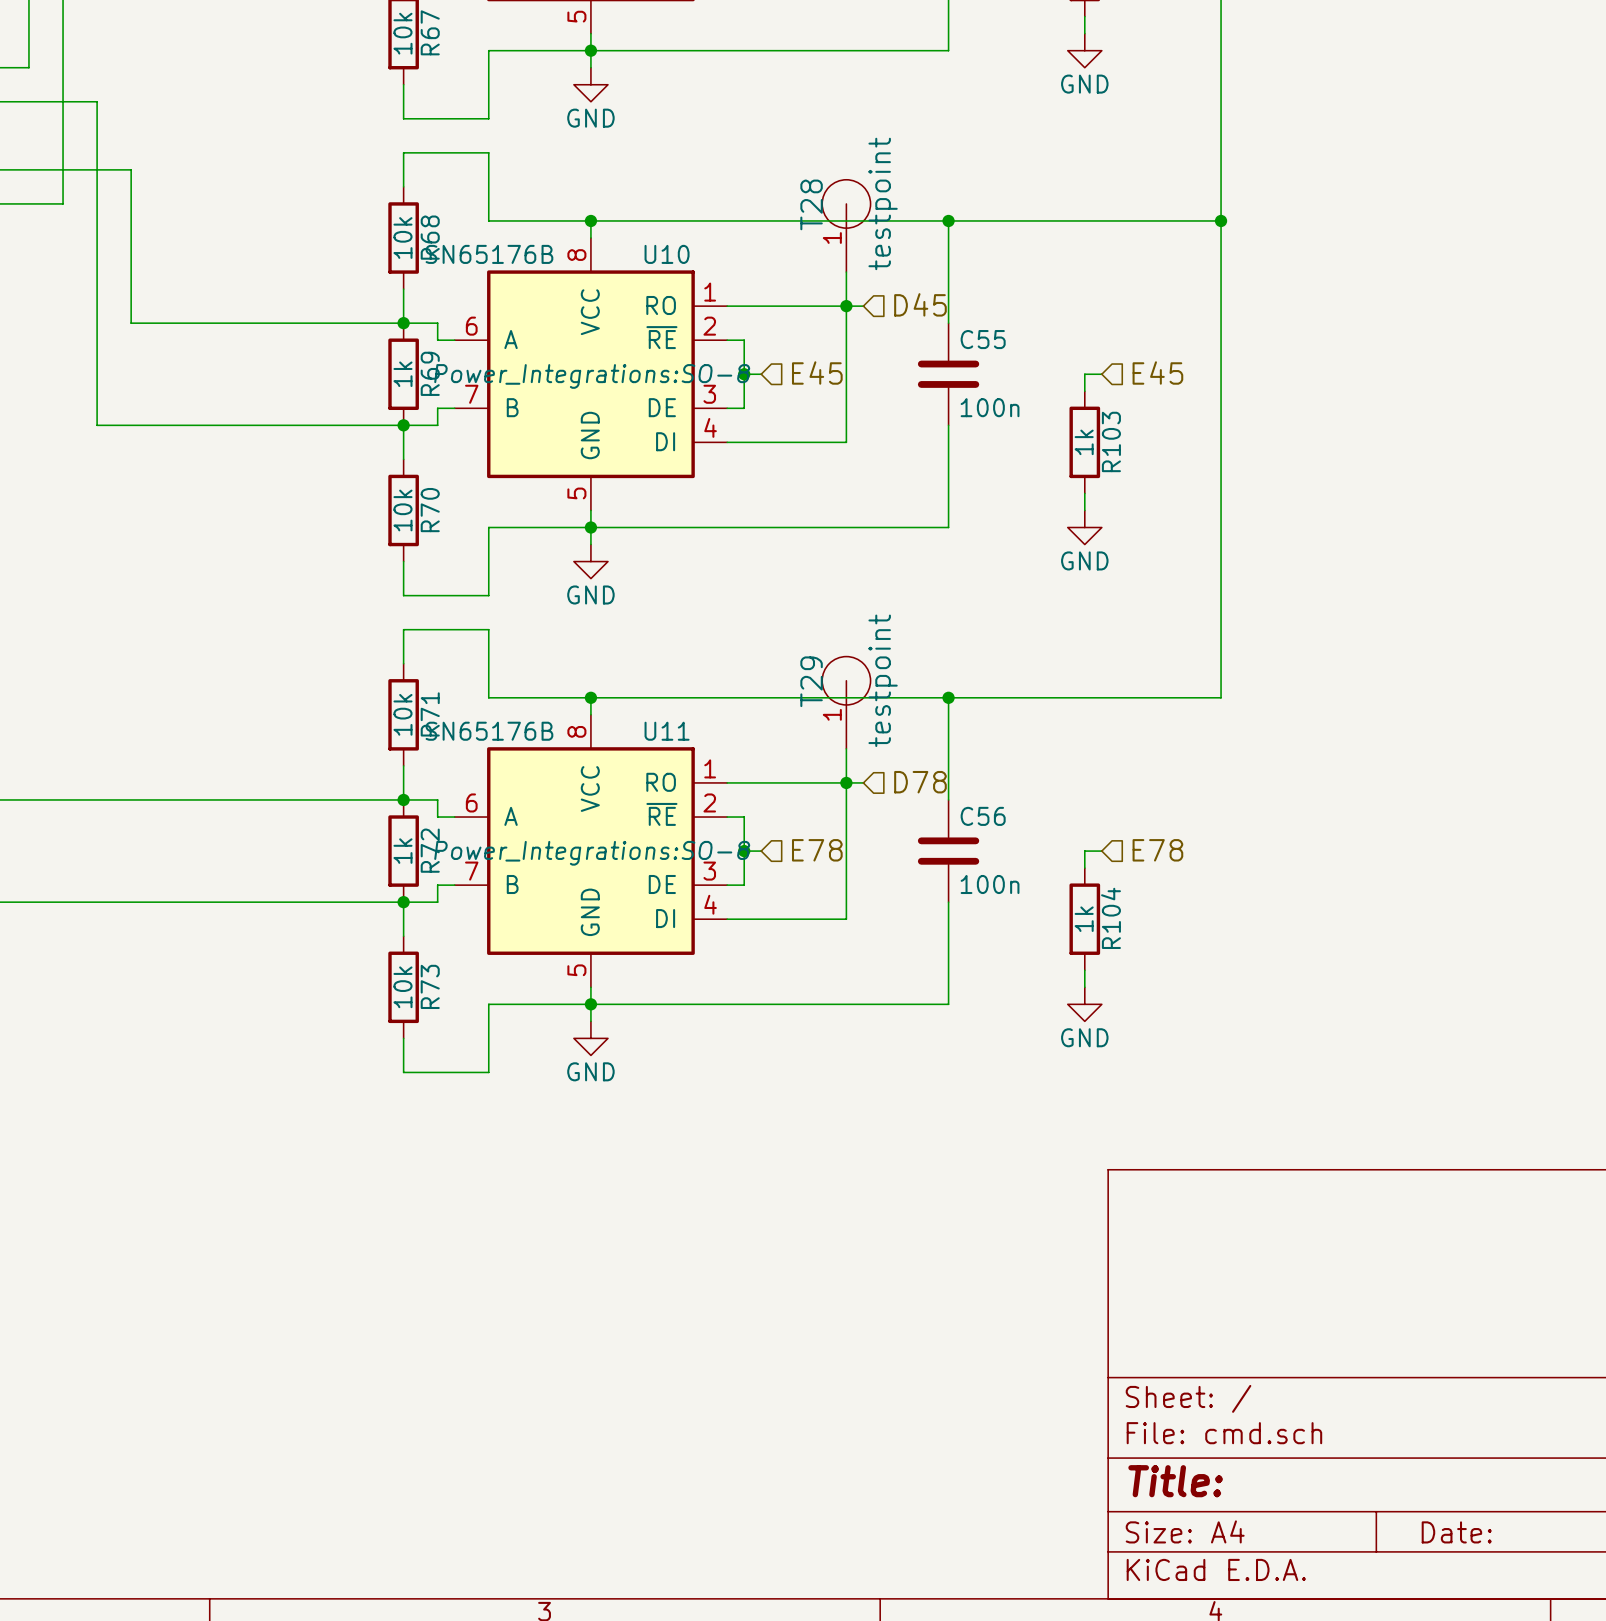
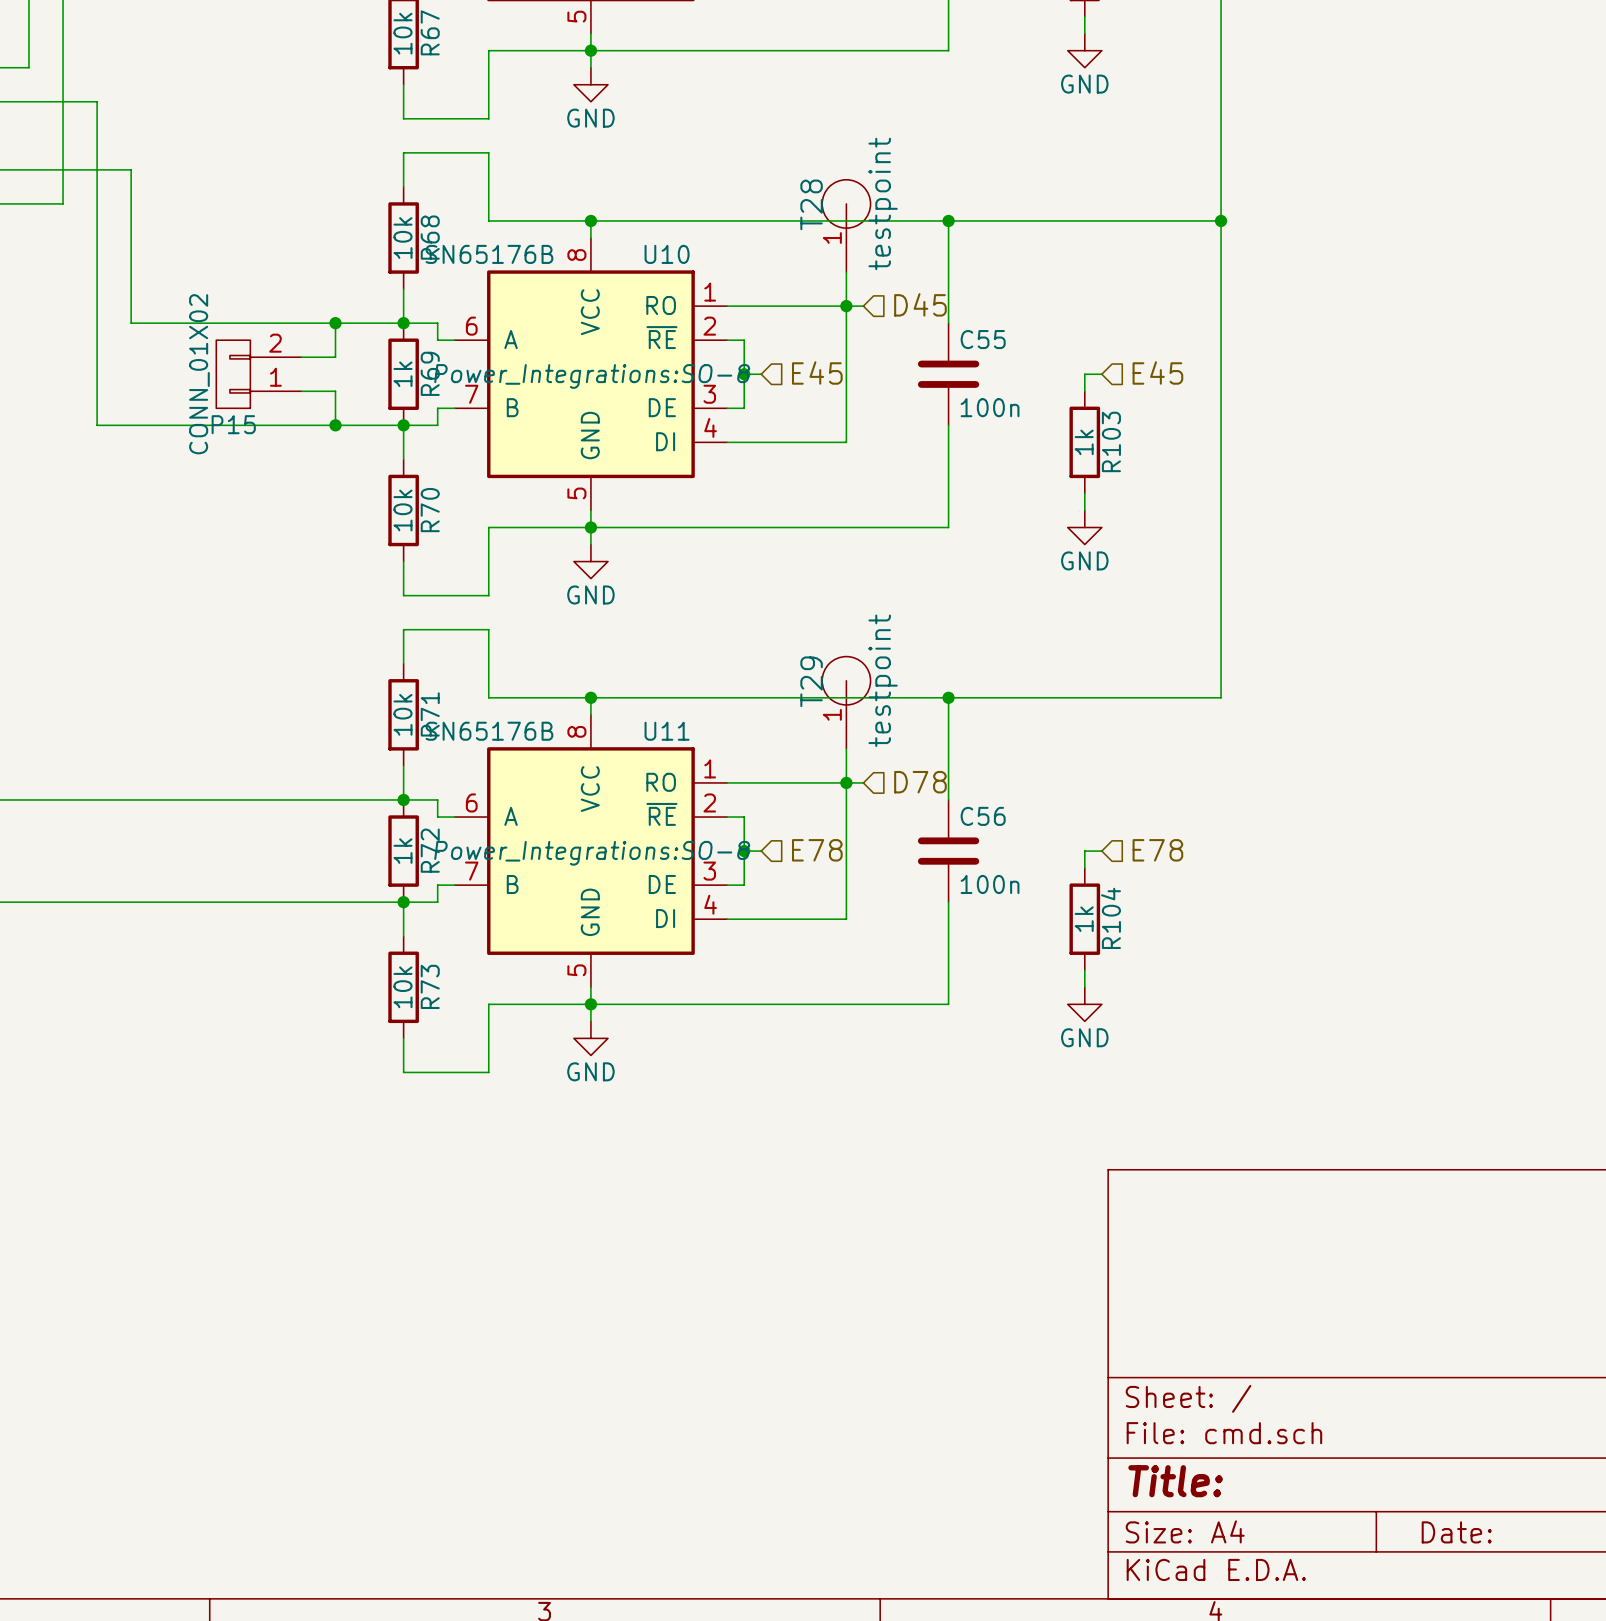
wire: none -> (335, 323) (335, 357) (301, 357)
junction: none -> (335, 323)
P15: none -> CONN_01X02 (258, 374)
wire: none -> (301, 391) (335, 391) (335, 425)
junction: none -> (335, 425)

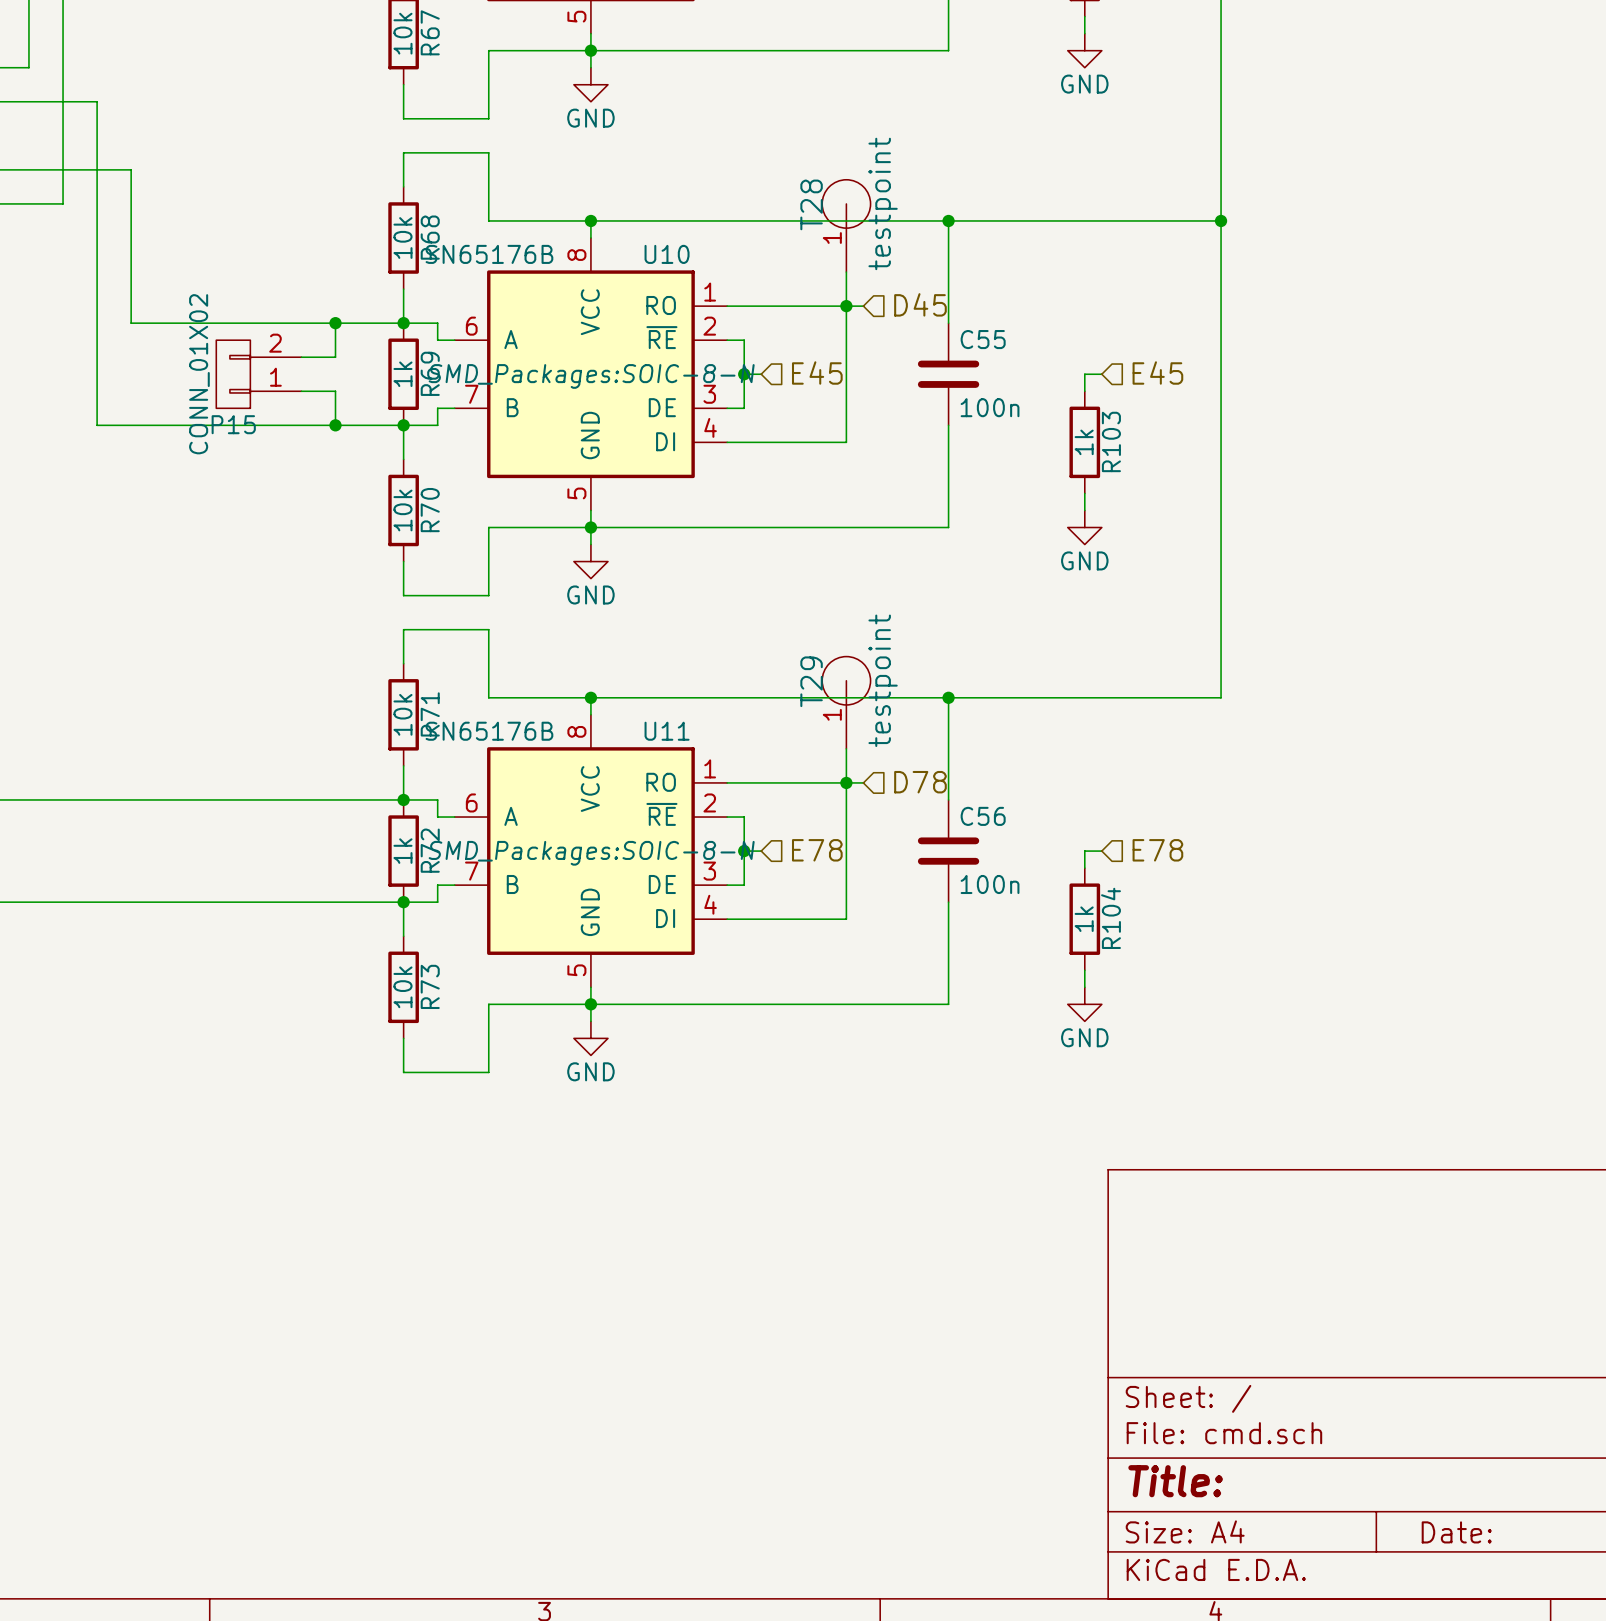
U10 text: Power_Integrations:SO-8 (592, 376) -> SMD_Packages:SOIC-8-N (591, 376)
U11 text: Power_Integrations:SO-8 (592, 853) -> SMD_Packages:SOIC-8-N (591, 853)

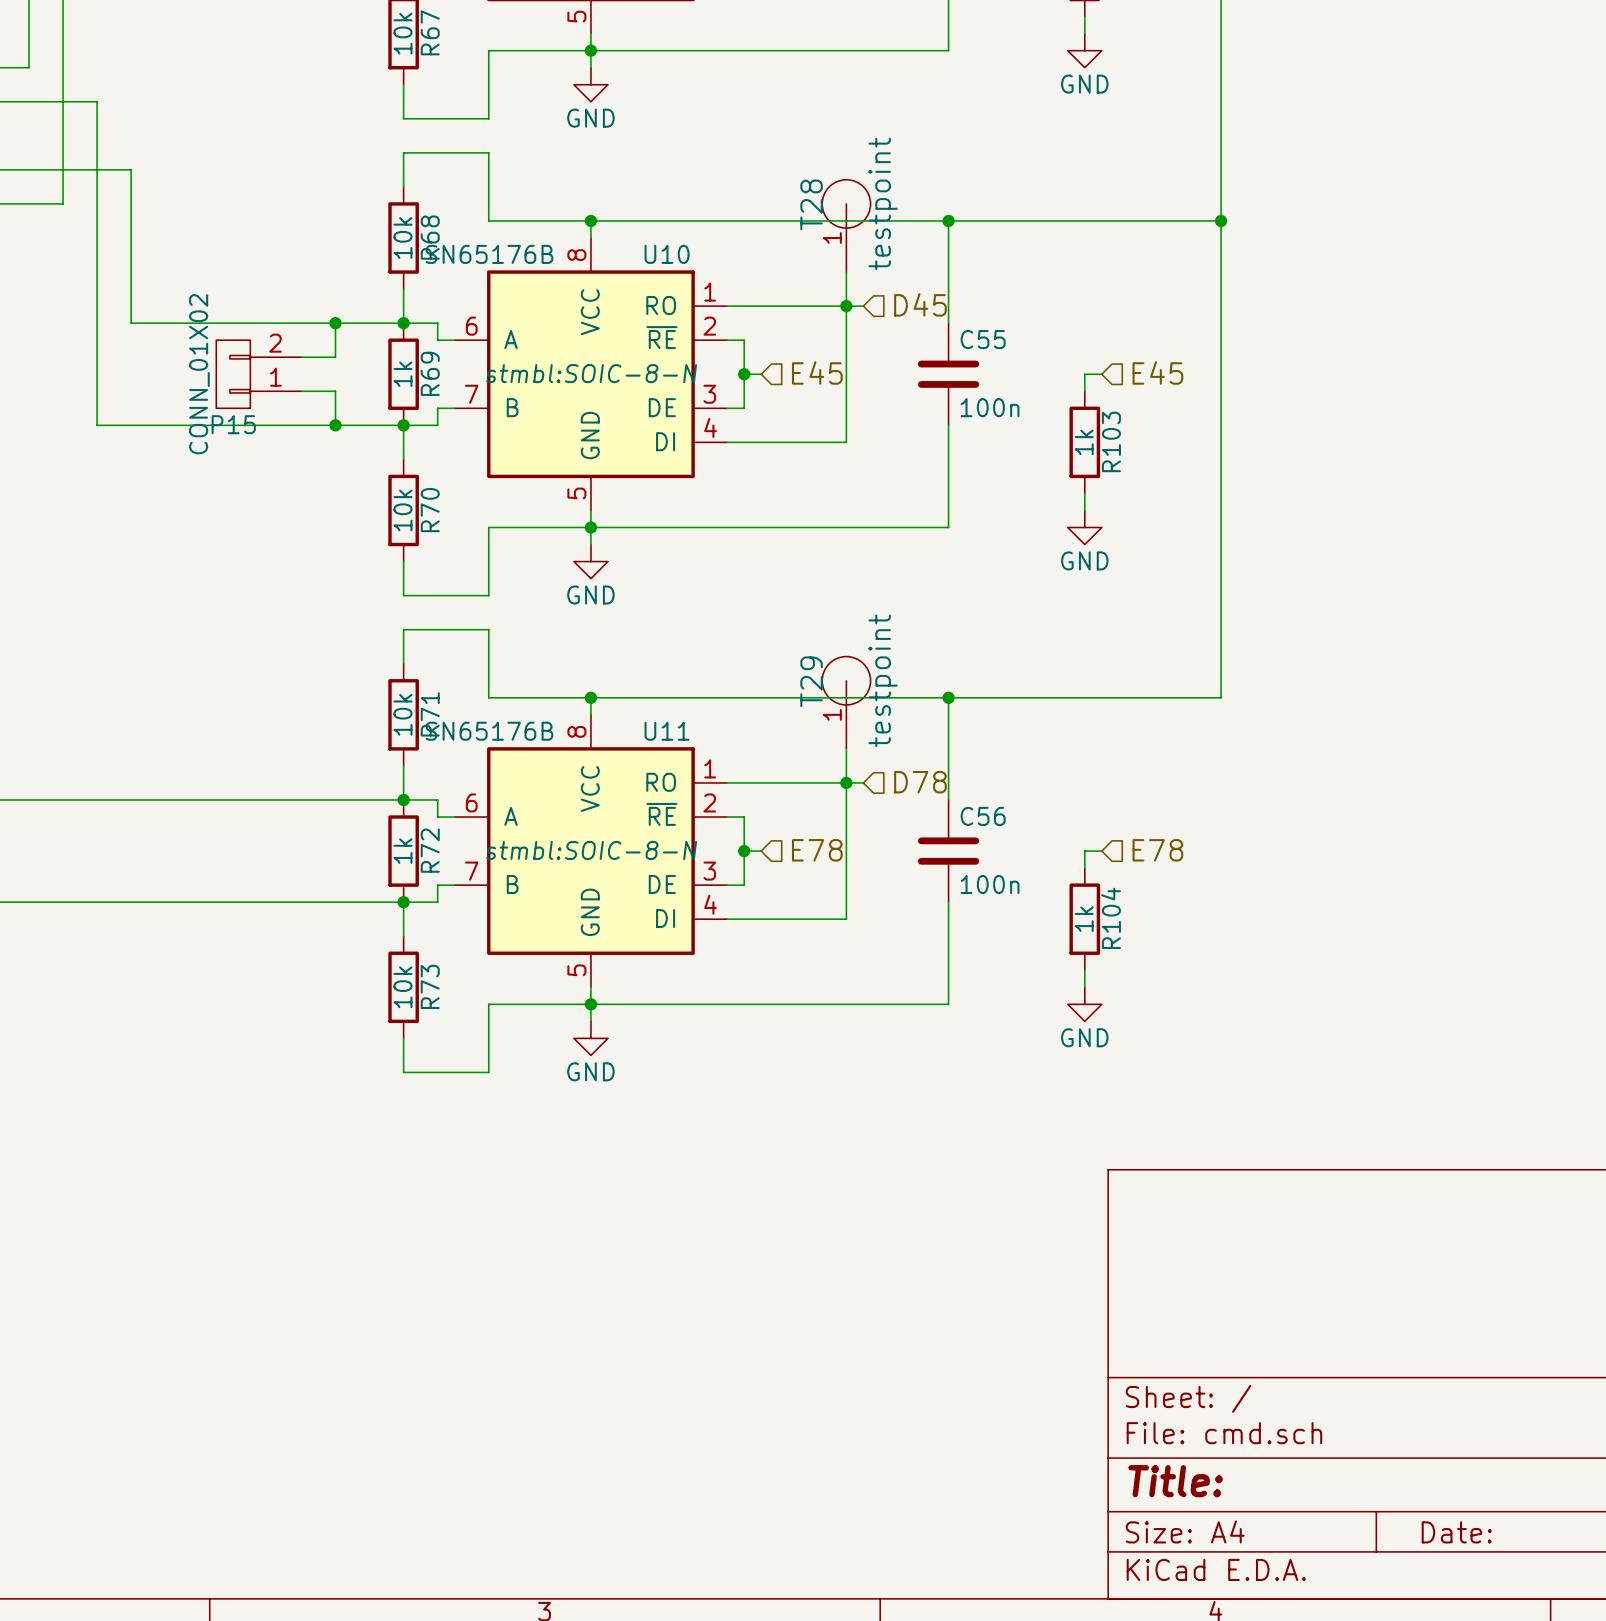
U10 text: SMD_Packages:SOIC-8-N (591, 376) -> stmbl:SOIC-8-N (591, 373)
U11 text: SMD_Packages:SOIC-8-N (591, 853) -> stmbl:SOIC-8-N (591, 850)

